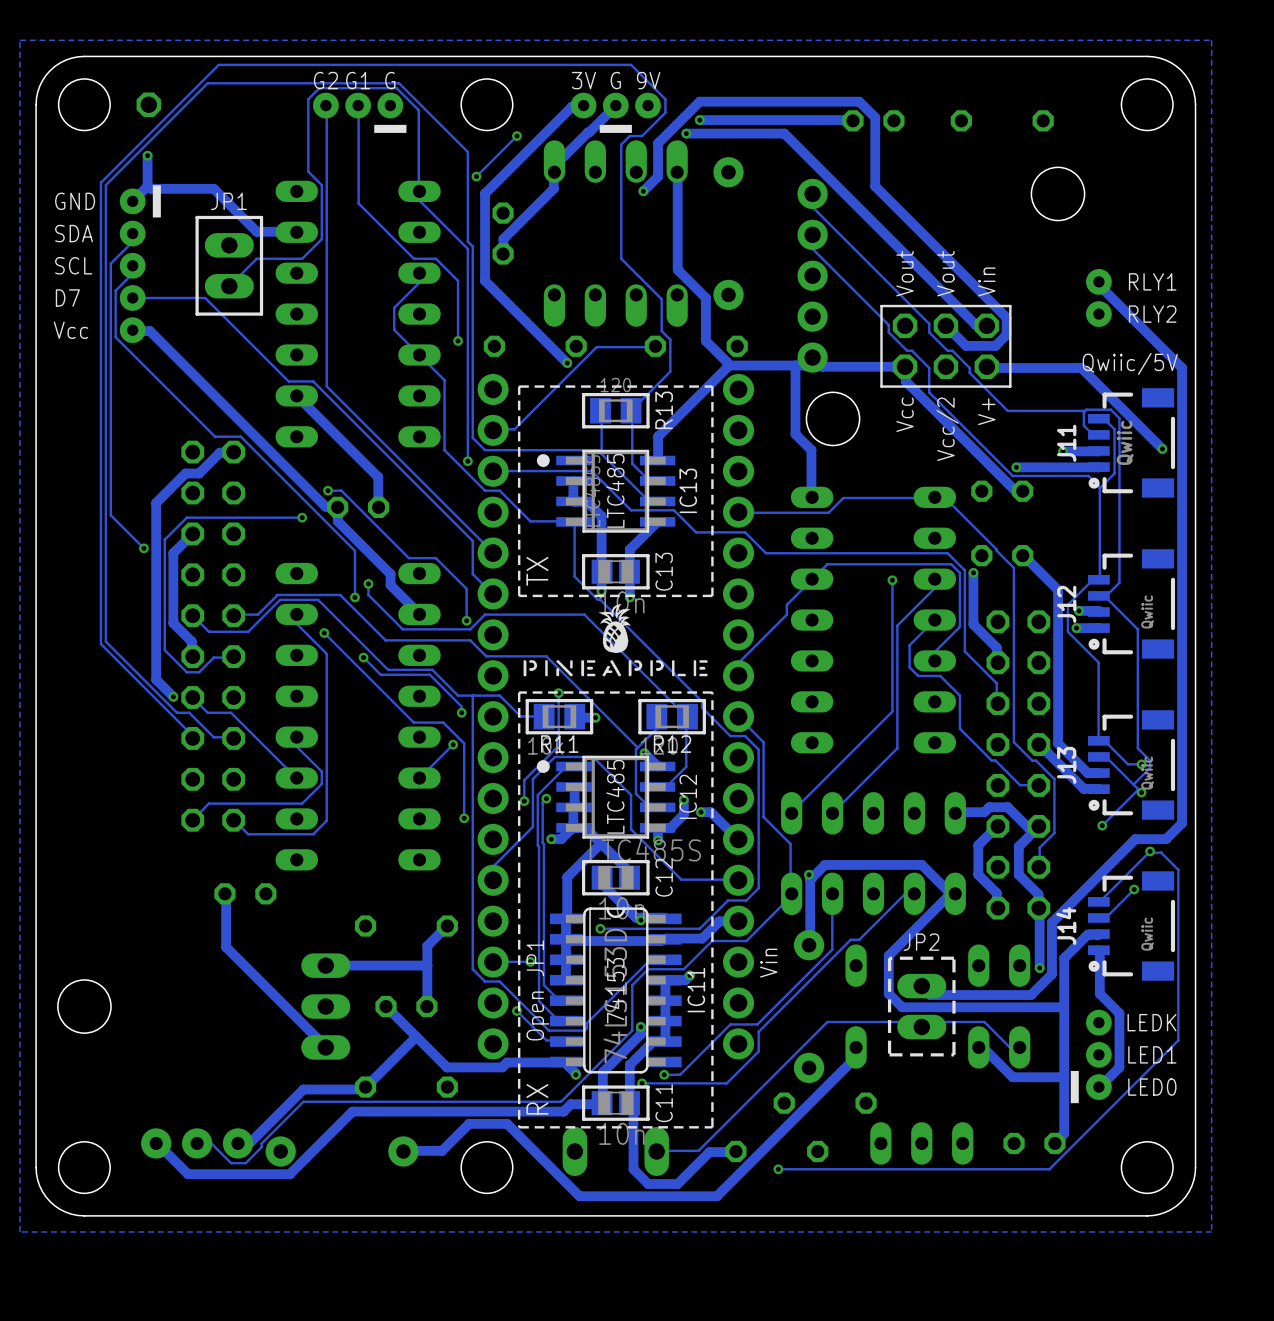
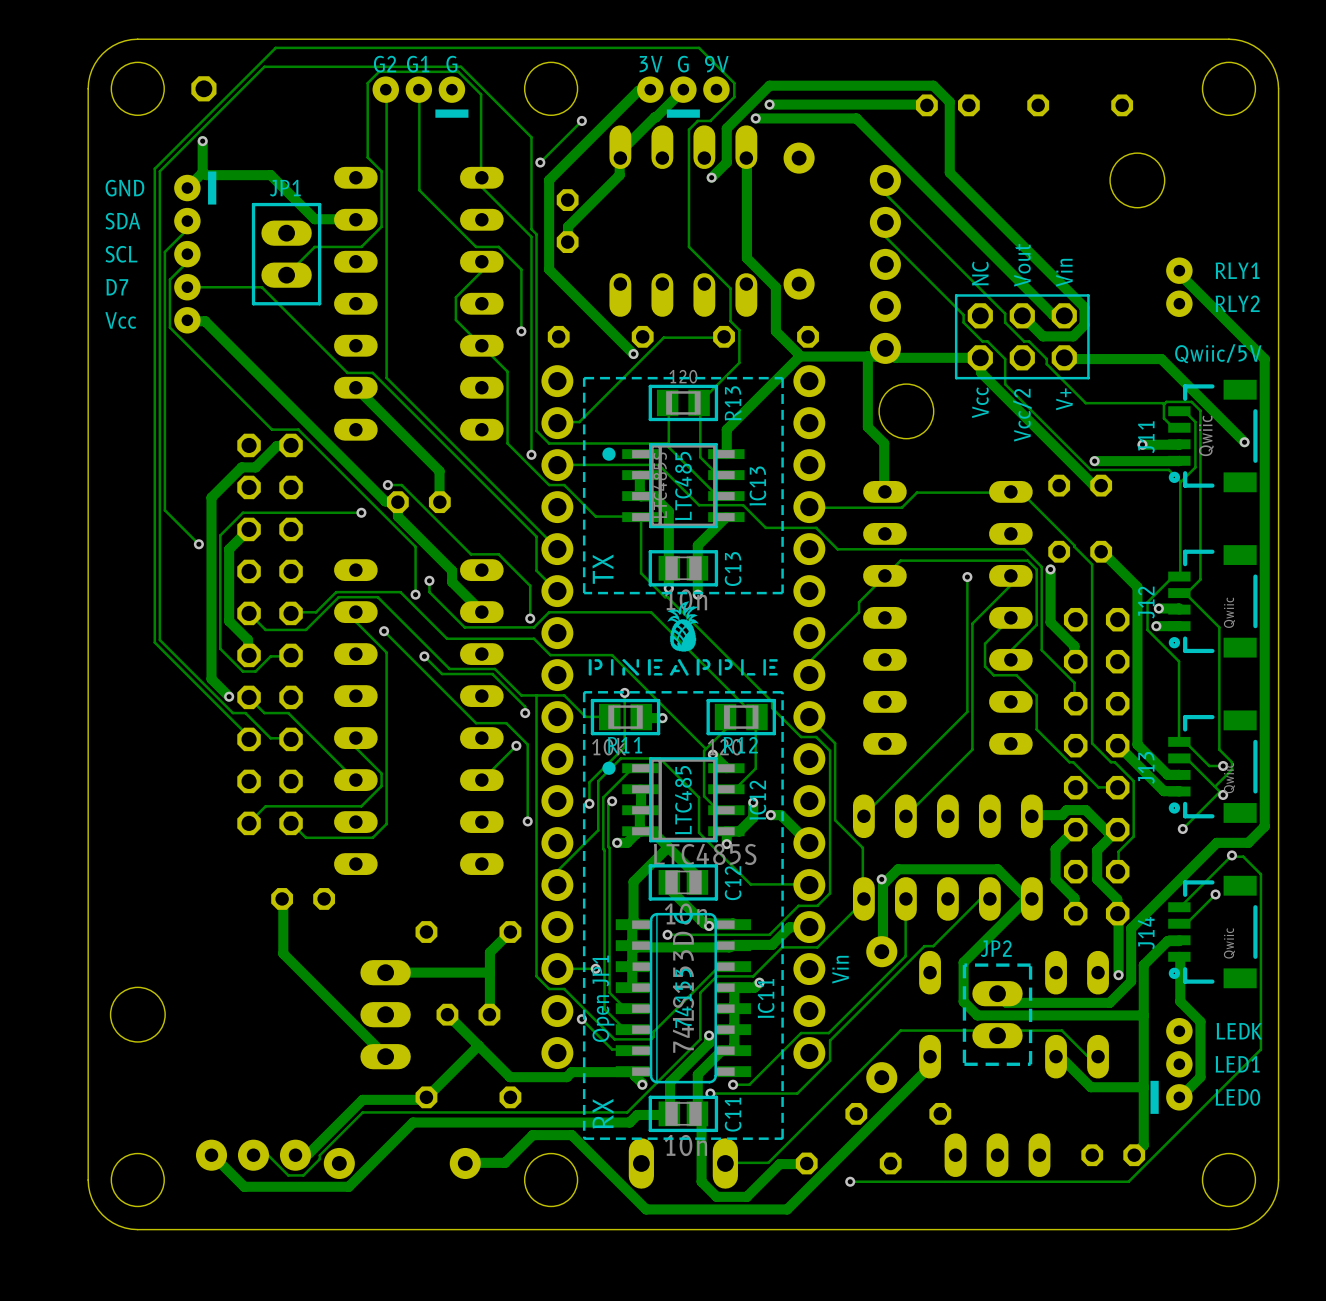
zone outline: (1211, 40) (19, 40) (19, 1232) (1211, 1232) (1211, 40) -> none
text: Vout (905, 273) -> NC (980, 273)

